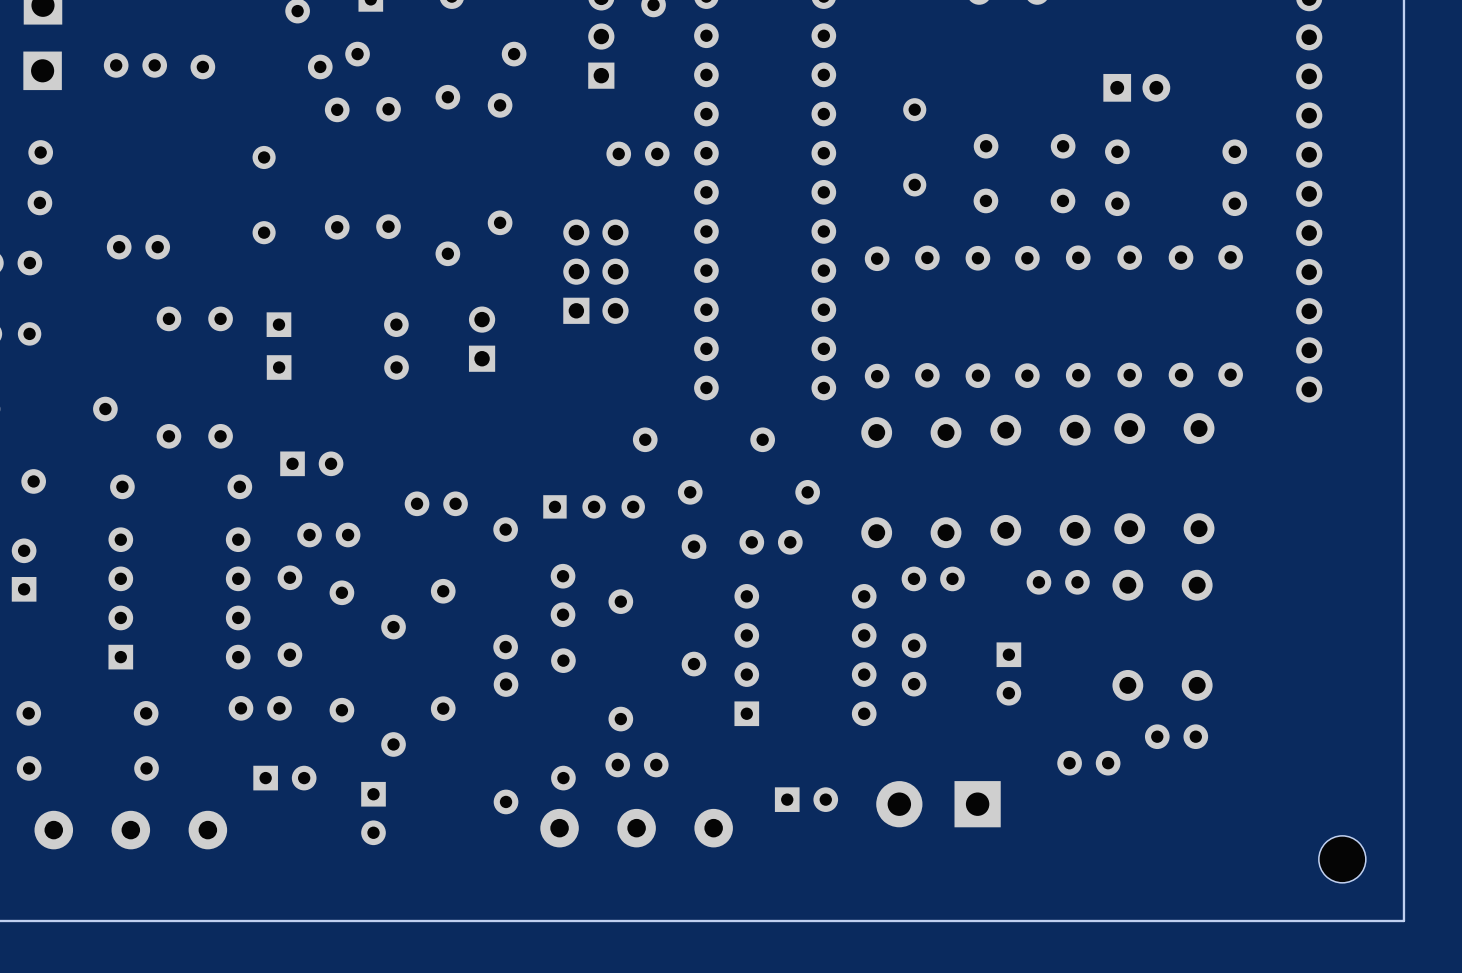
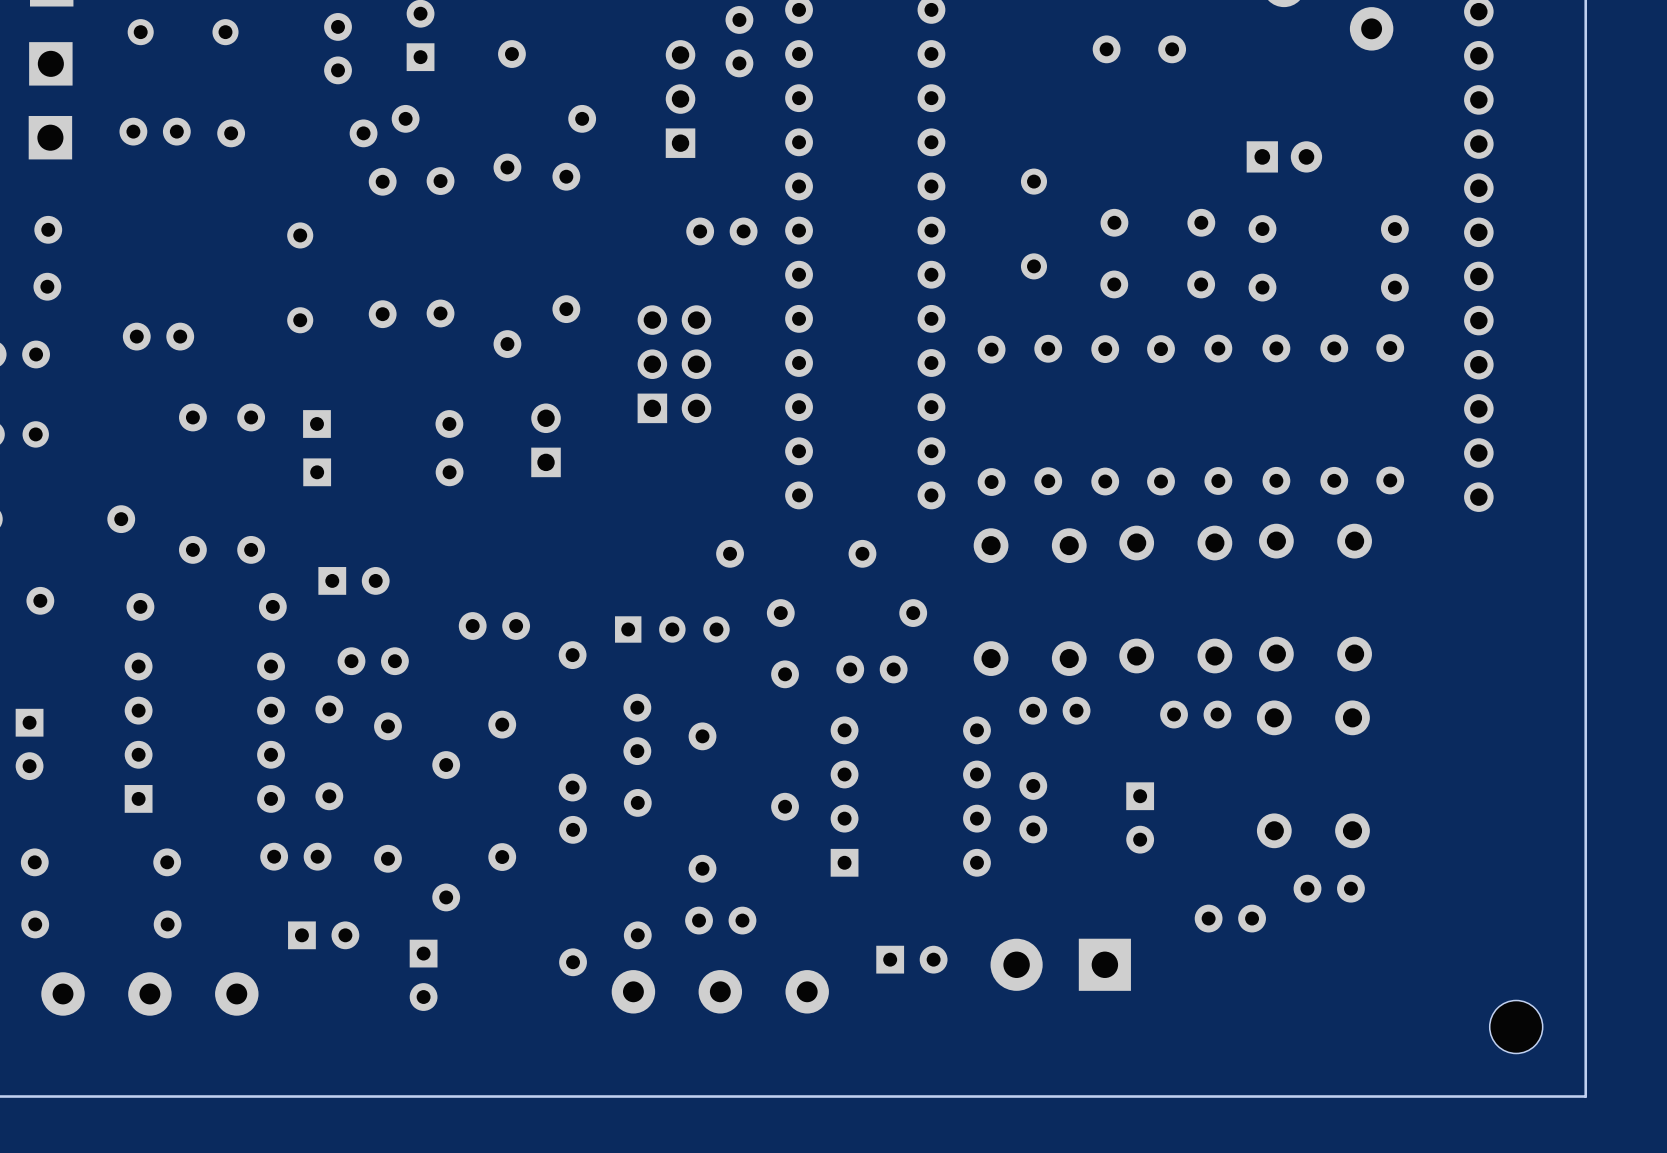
part rotation: 0° (24, 570) -> 180° (29, 744)
part position: (24, 570) -> (29, 744)

